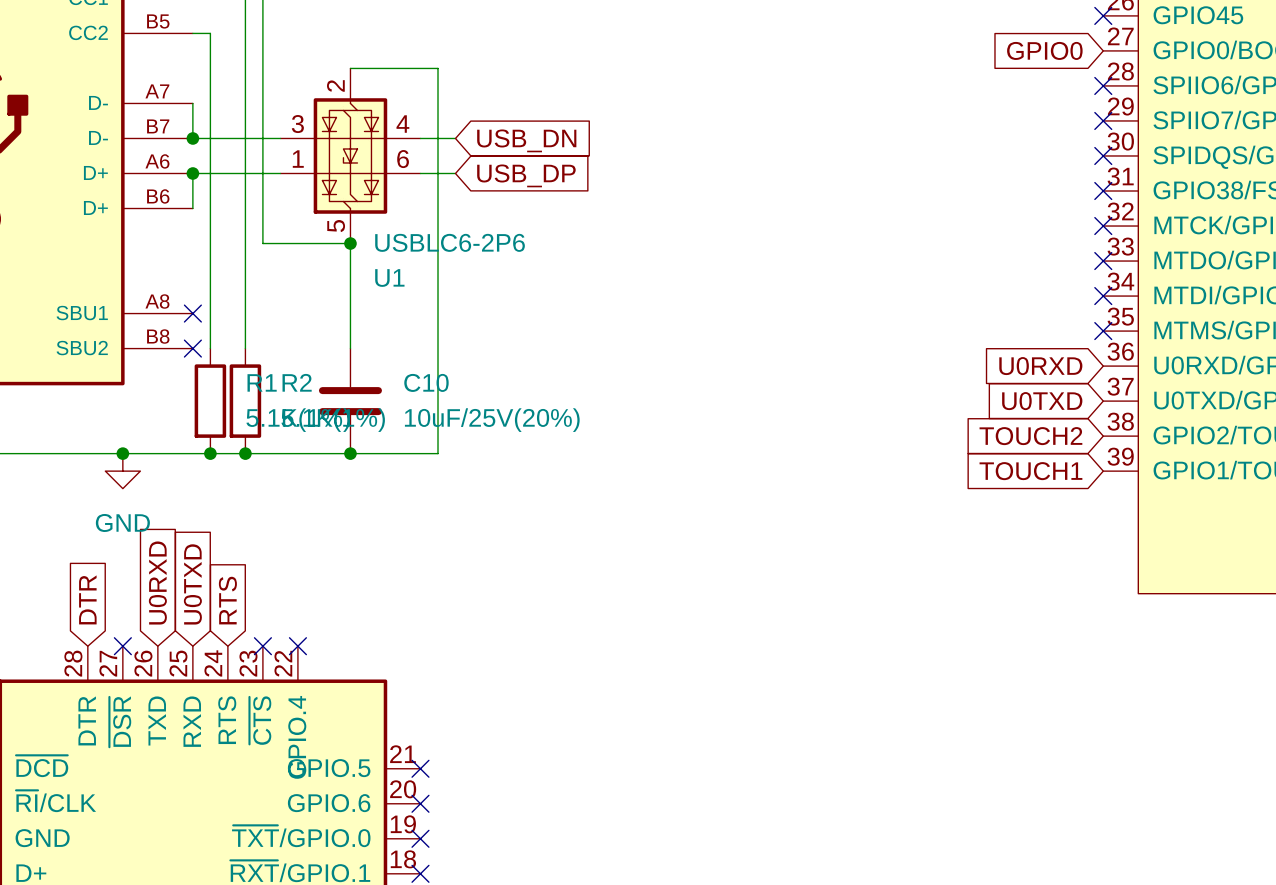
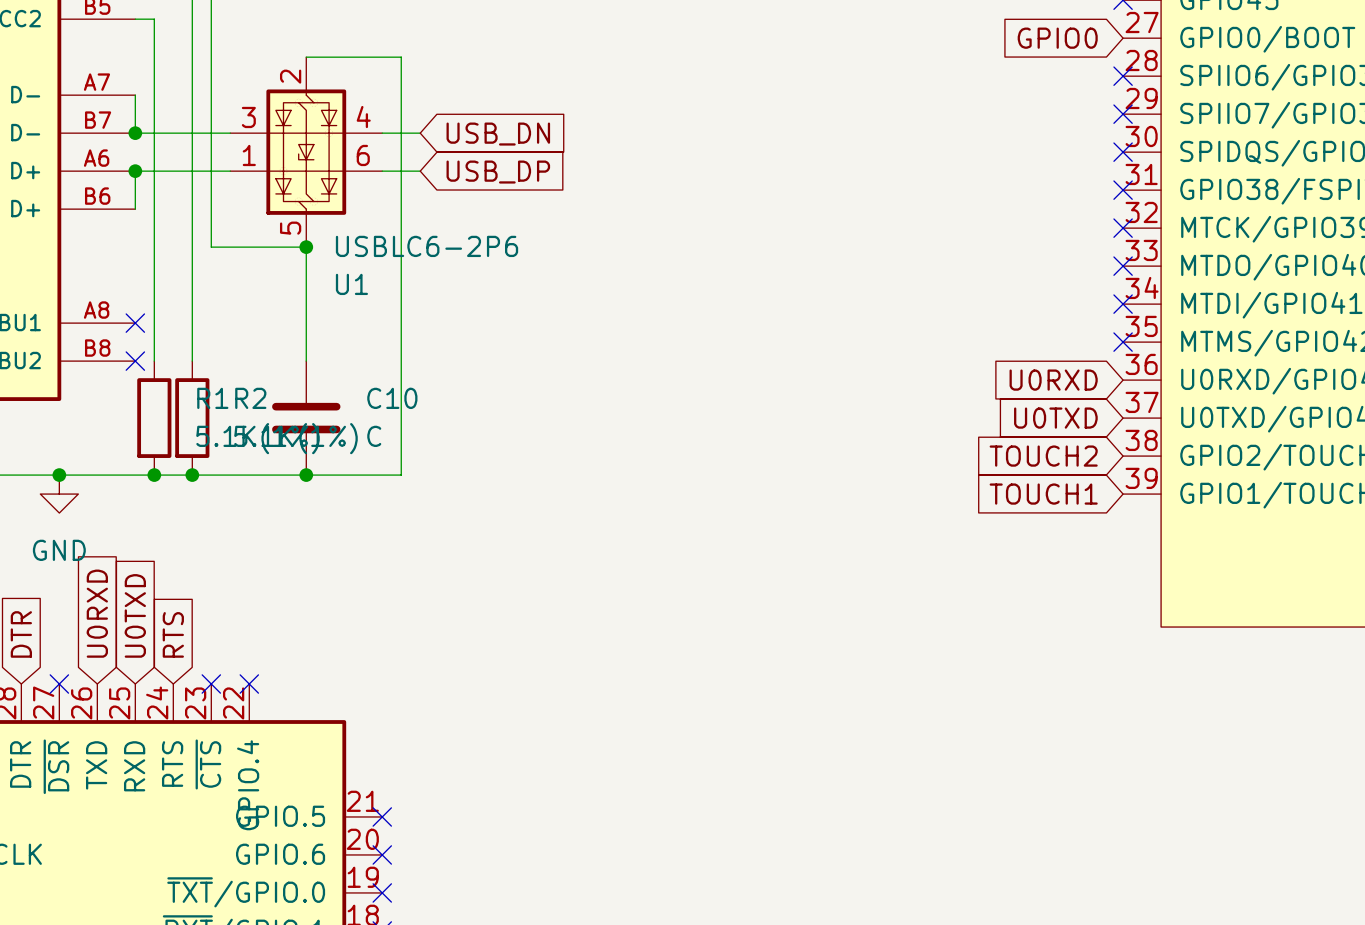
C10 value: 10uF/25V(20%) (492, 420) -> C (374, 436)

